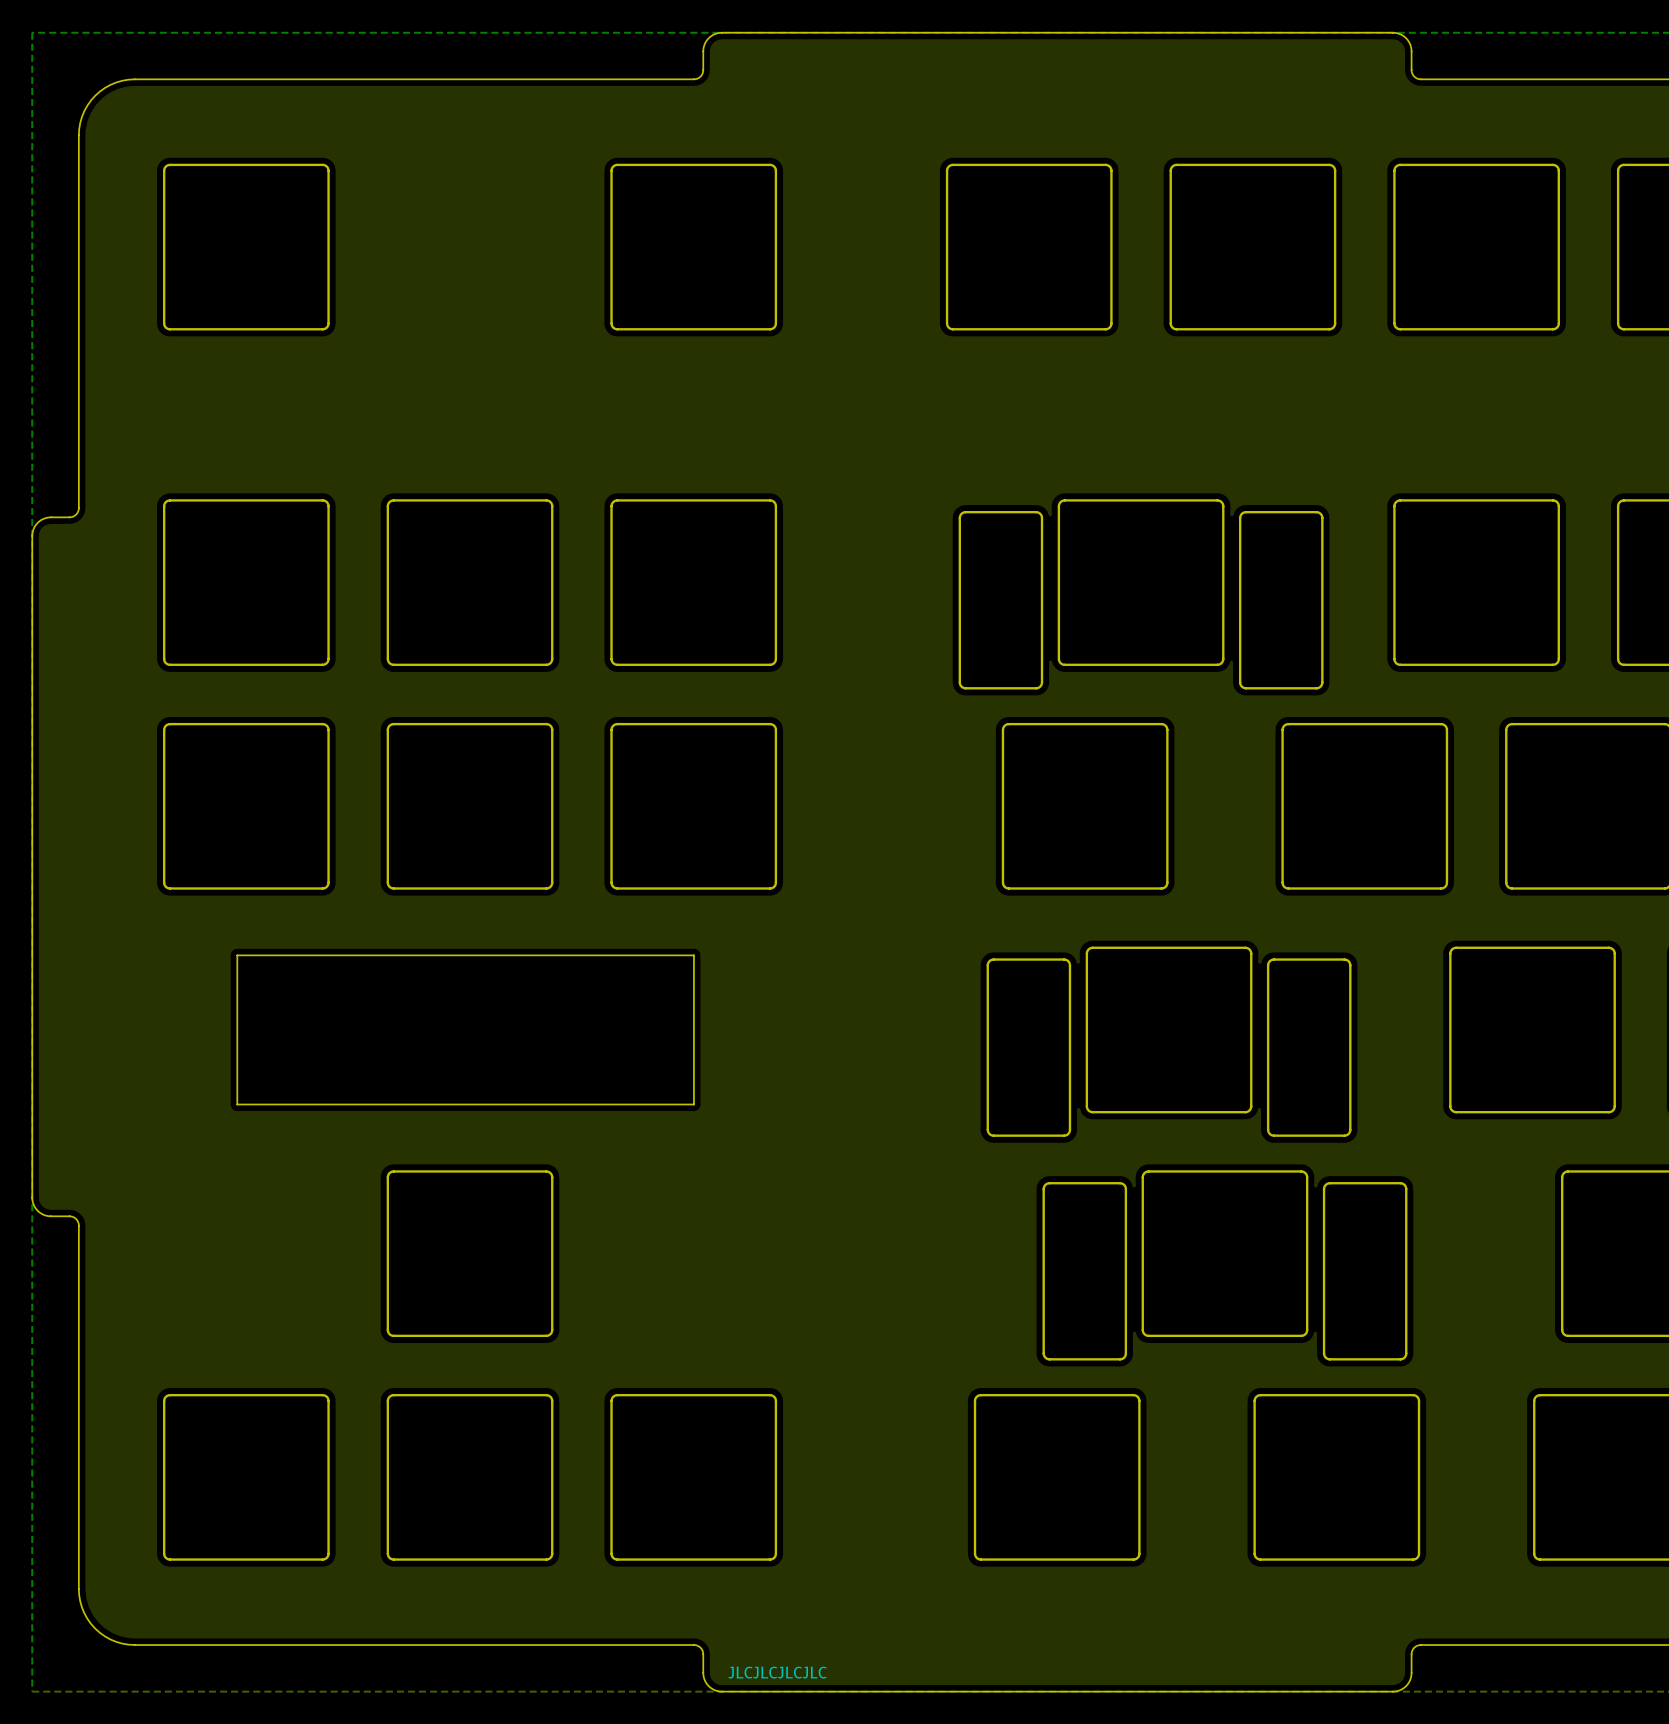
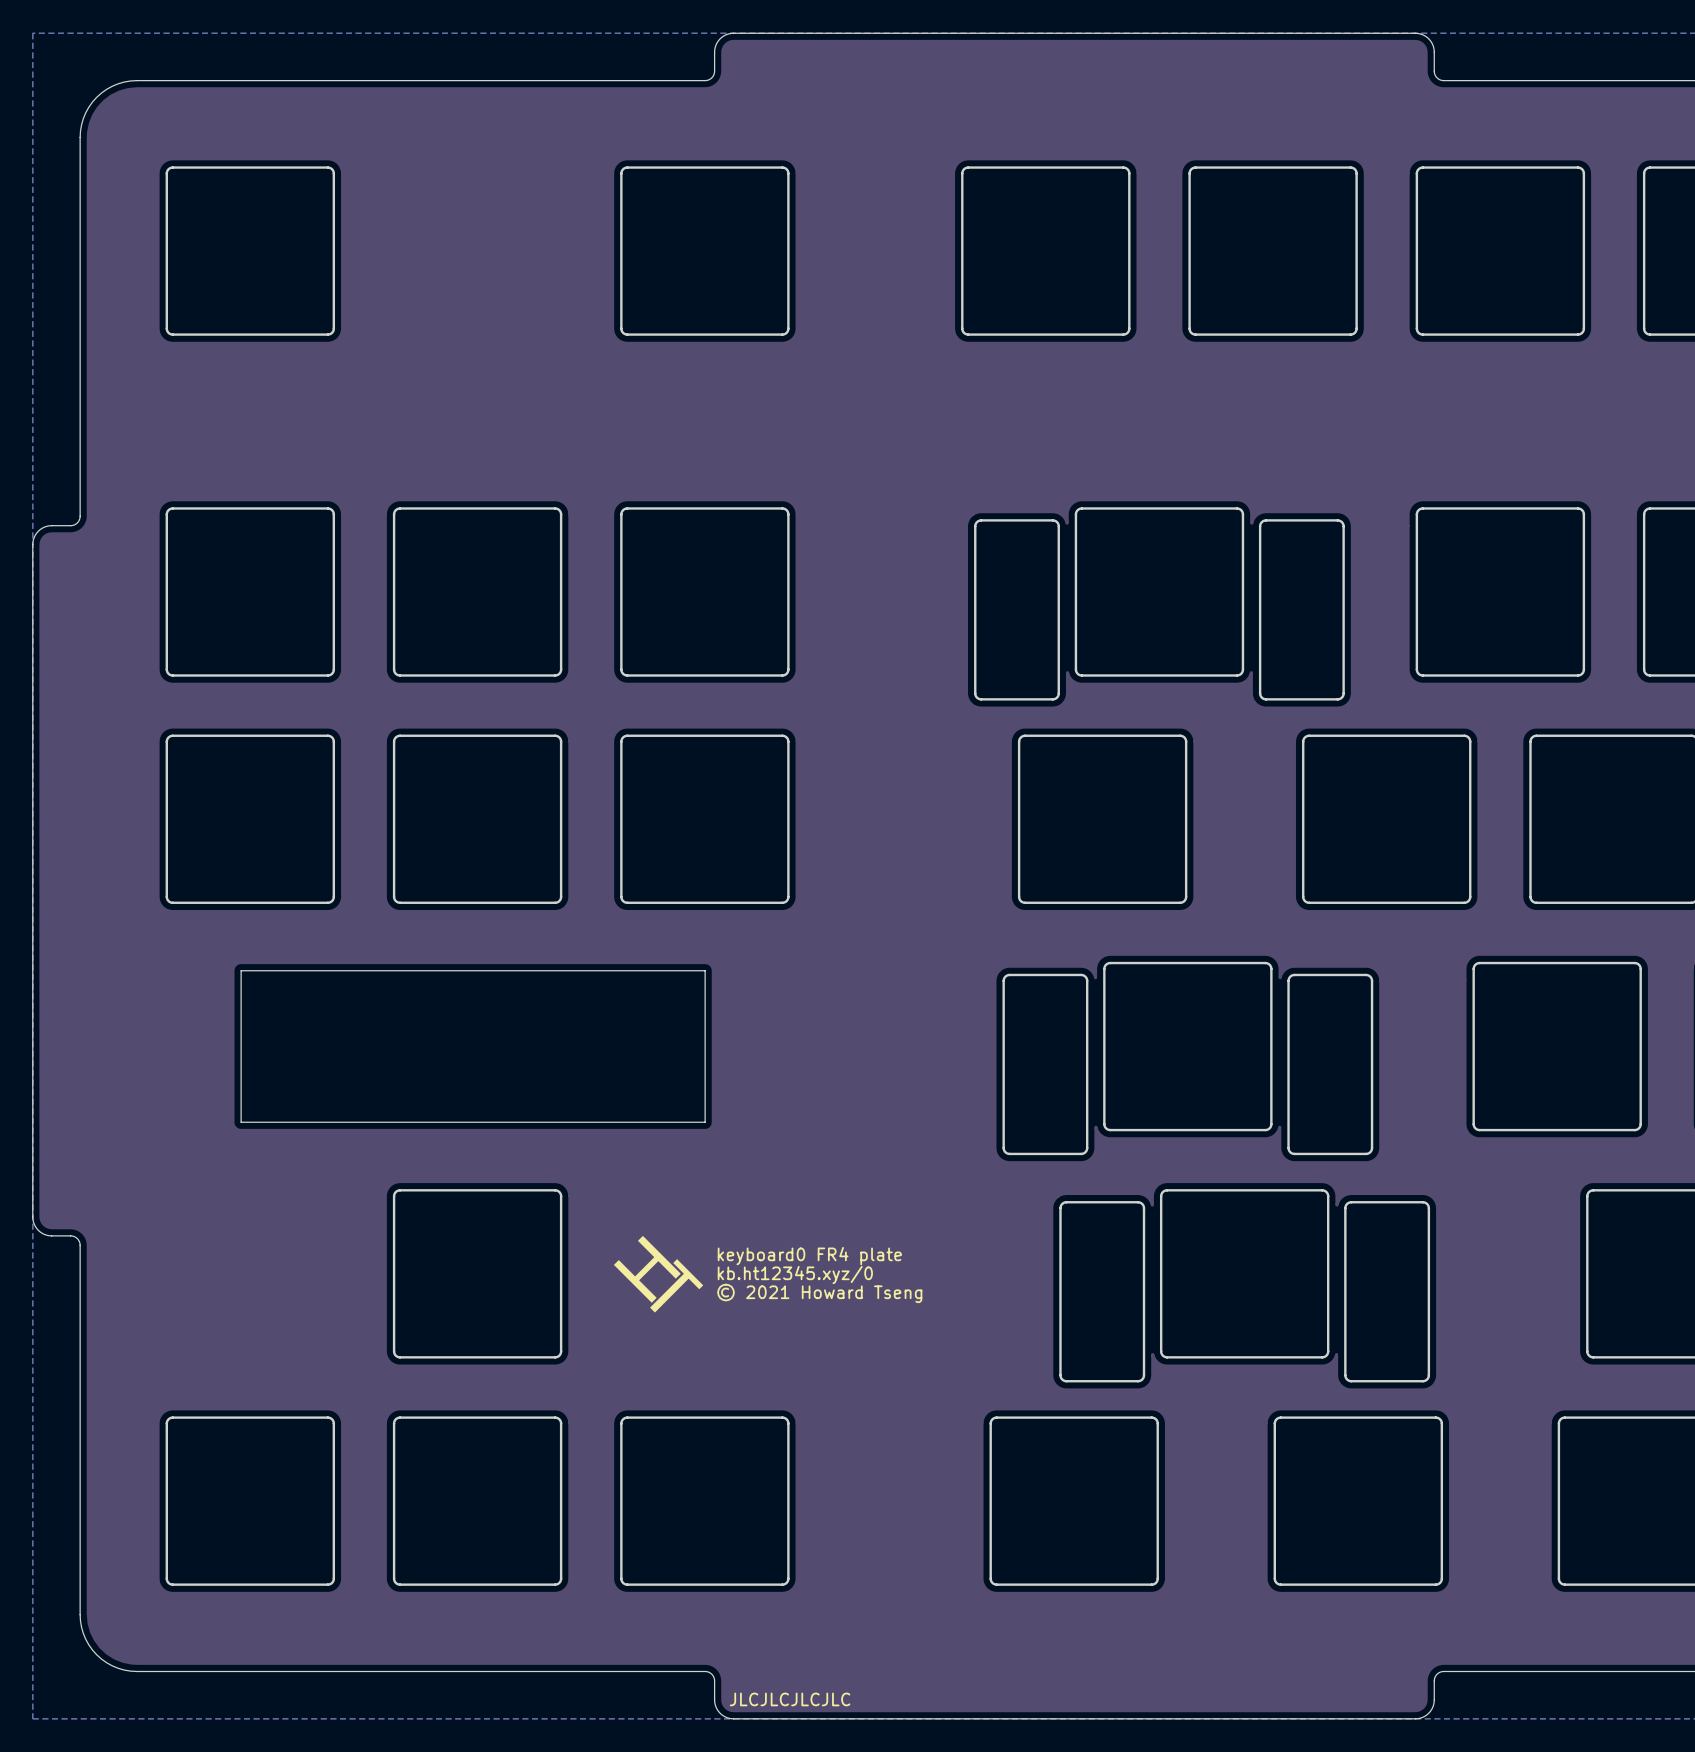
drawing: none -> [613, 1235, 704, 1313]
text: none -> keyboard0 FR4 plate (809, 1256)
text: none -> kb.ht12345.xyz/0 (795, 1275)
text: none -> © 2021 Howard Tseng (819, 1293)

